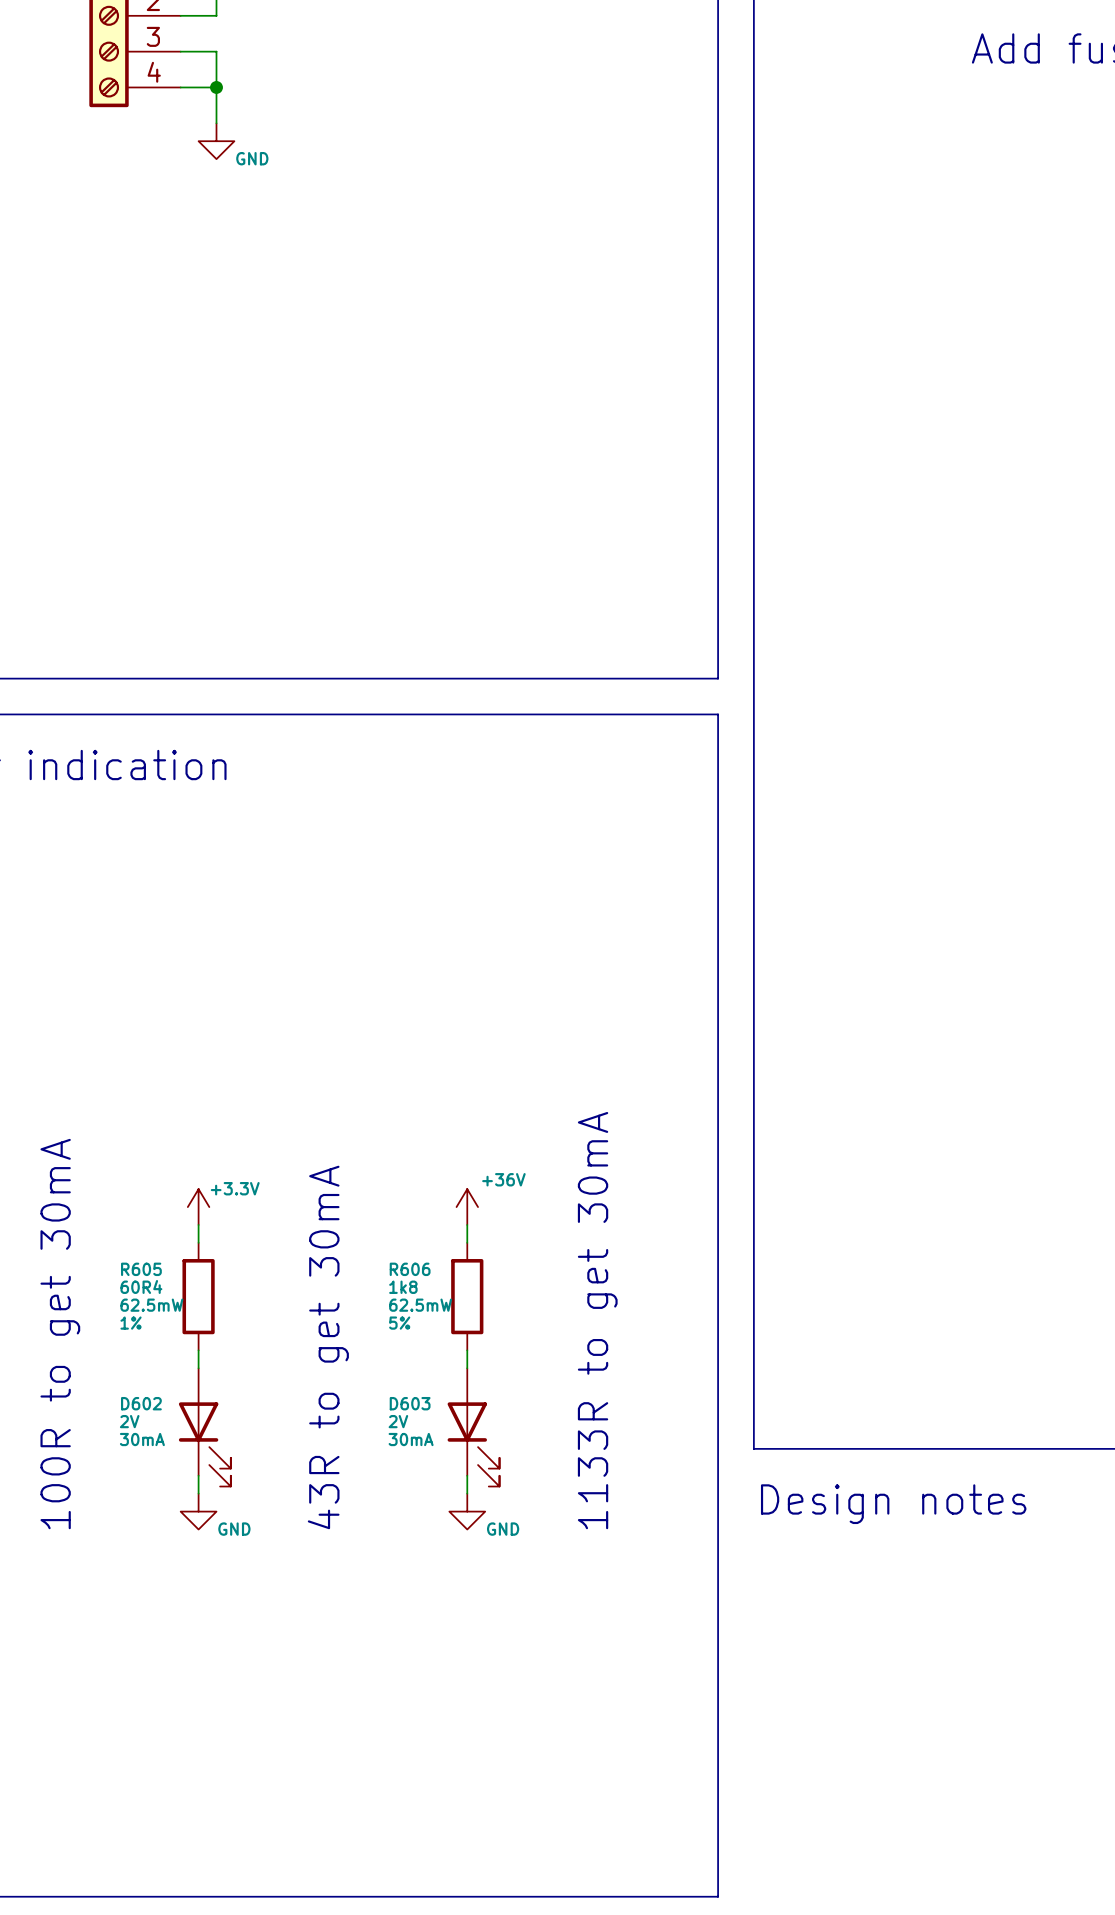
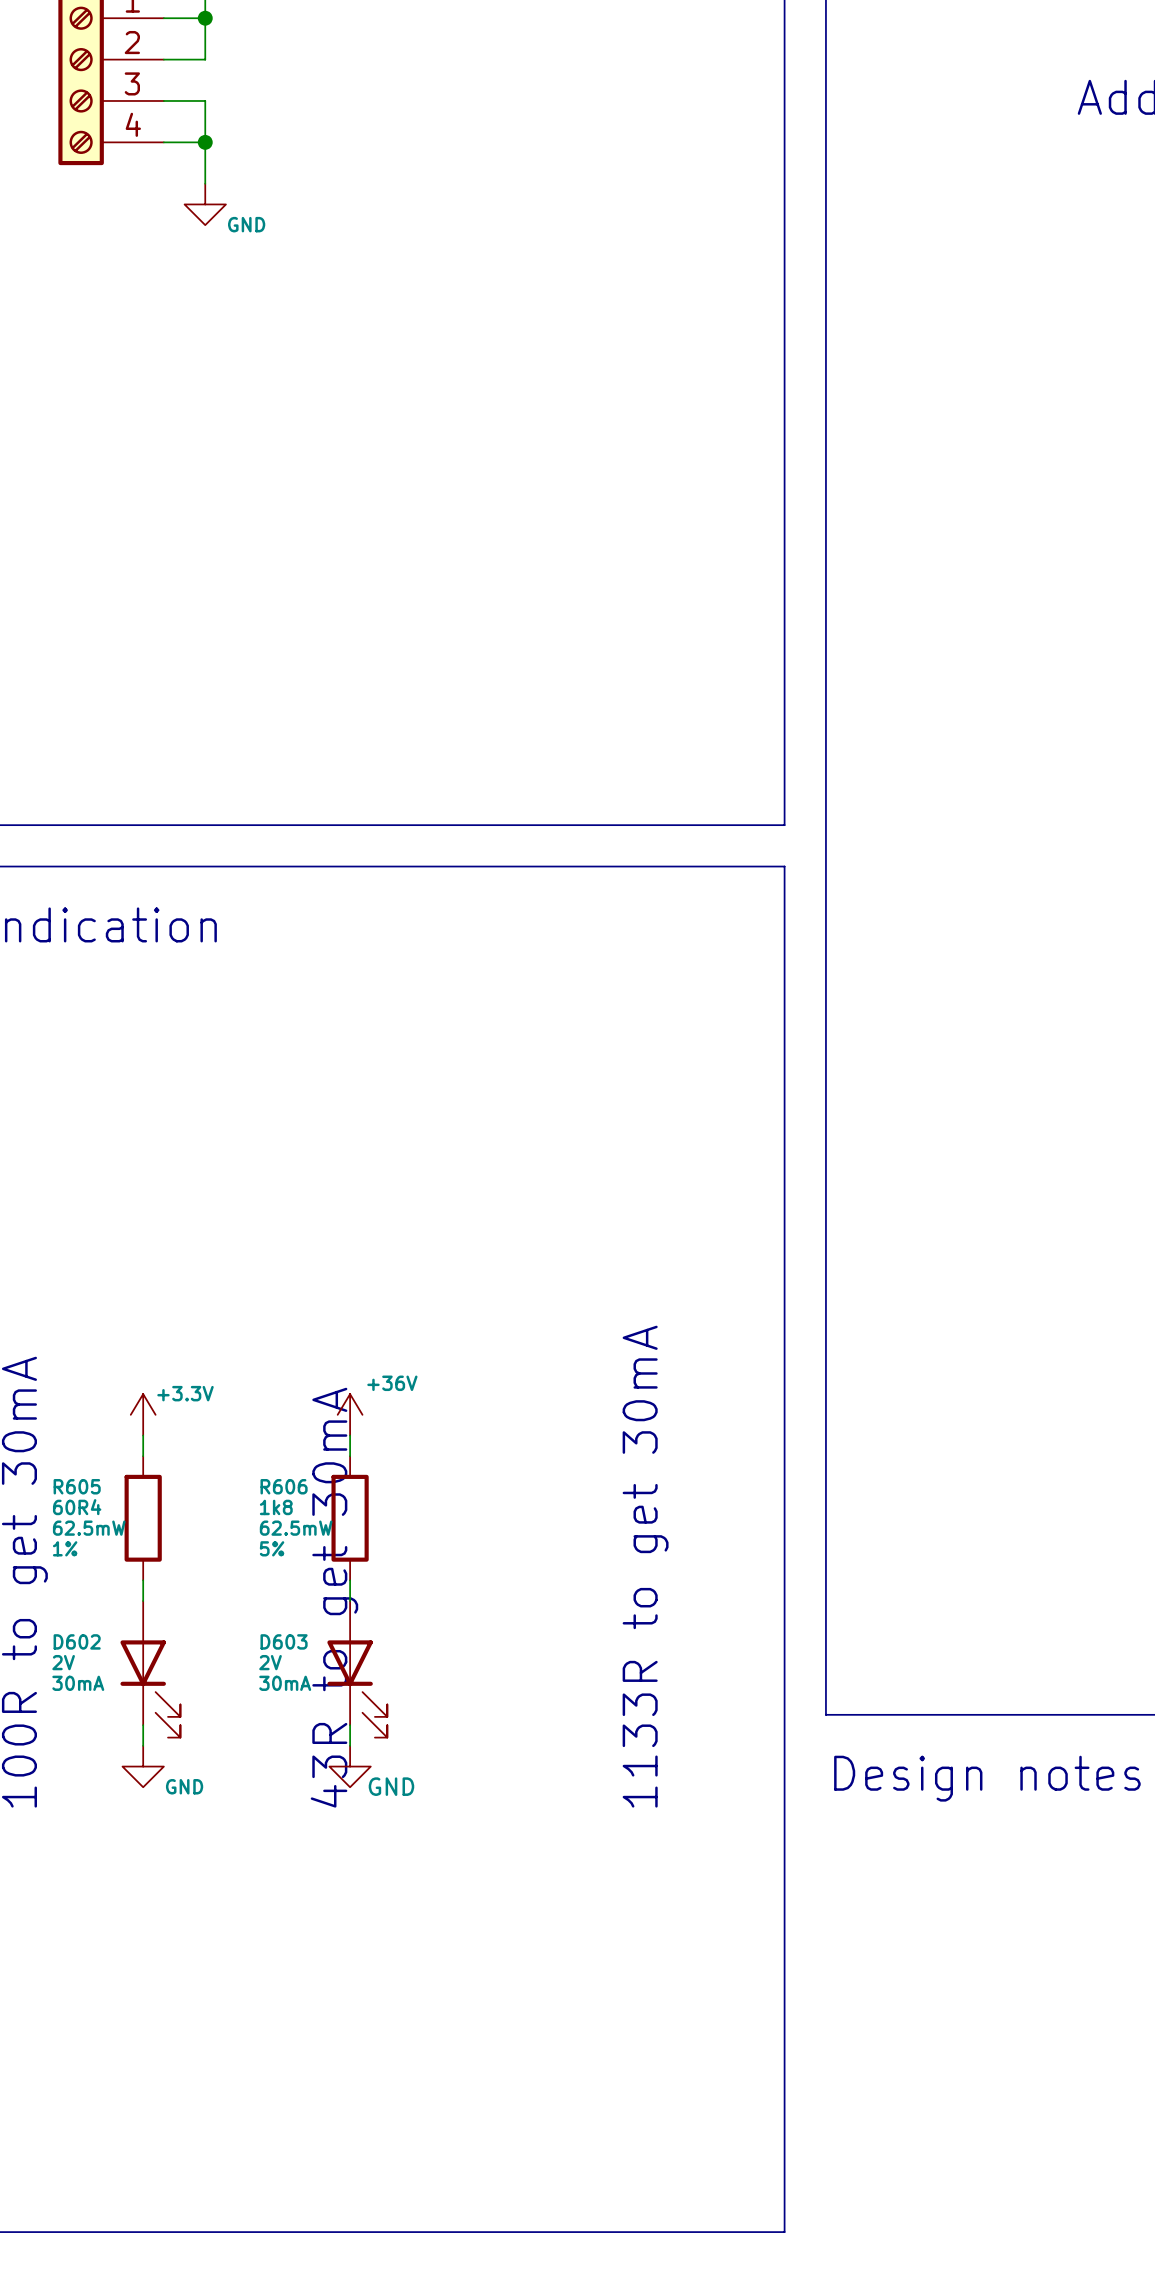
power symbol position: +3.3V (198, 1207) -> +3.3V (143, 1414)
power symbol position: +36V (467, 1207) -> +36V (350, 1414)
wire: (198, 1224) (198, 1242) -> (143, 1435) (143, 1456)
wire: (467, 1224) (467, 1242) -> (350, 1435) (350, 1456)
R605 position: (198, 1296) -> (143, 1518)
R606 position: (467, 1296) -> (350, 1518)
wire: (198, 1350) (198, 1368) -> (143, 1580) (143, 1601)
wire: (467, 1350) (467, 1368) -> (350, 1580) (350, 1601)
D602 position: (204, 1427) -> (150, 1669)
D603 position: (473, 1427) -> (357, 1669)
wire: (198, 1475) (198, 1493) -> (143, 1725) (143, 1745)
wire: (467, 1475) (467, 1493) -> (350, 1725) (350, 1745)
power symbol: none -> GND (350, 1766)
power symbol position: GND (198, 1511) -> GND (143, 1766)
power symbol: GND (467, 1511) -> none

